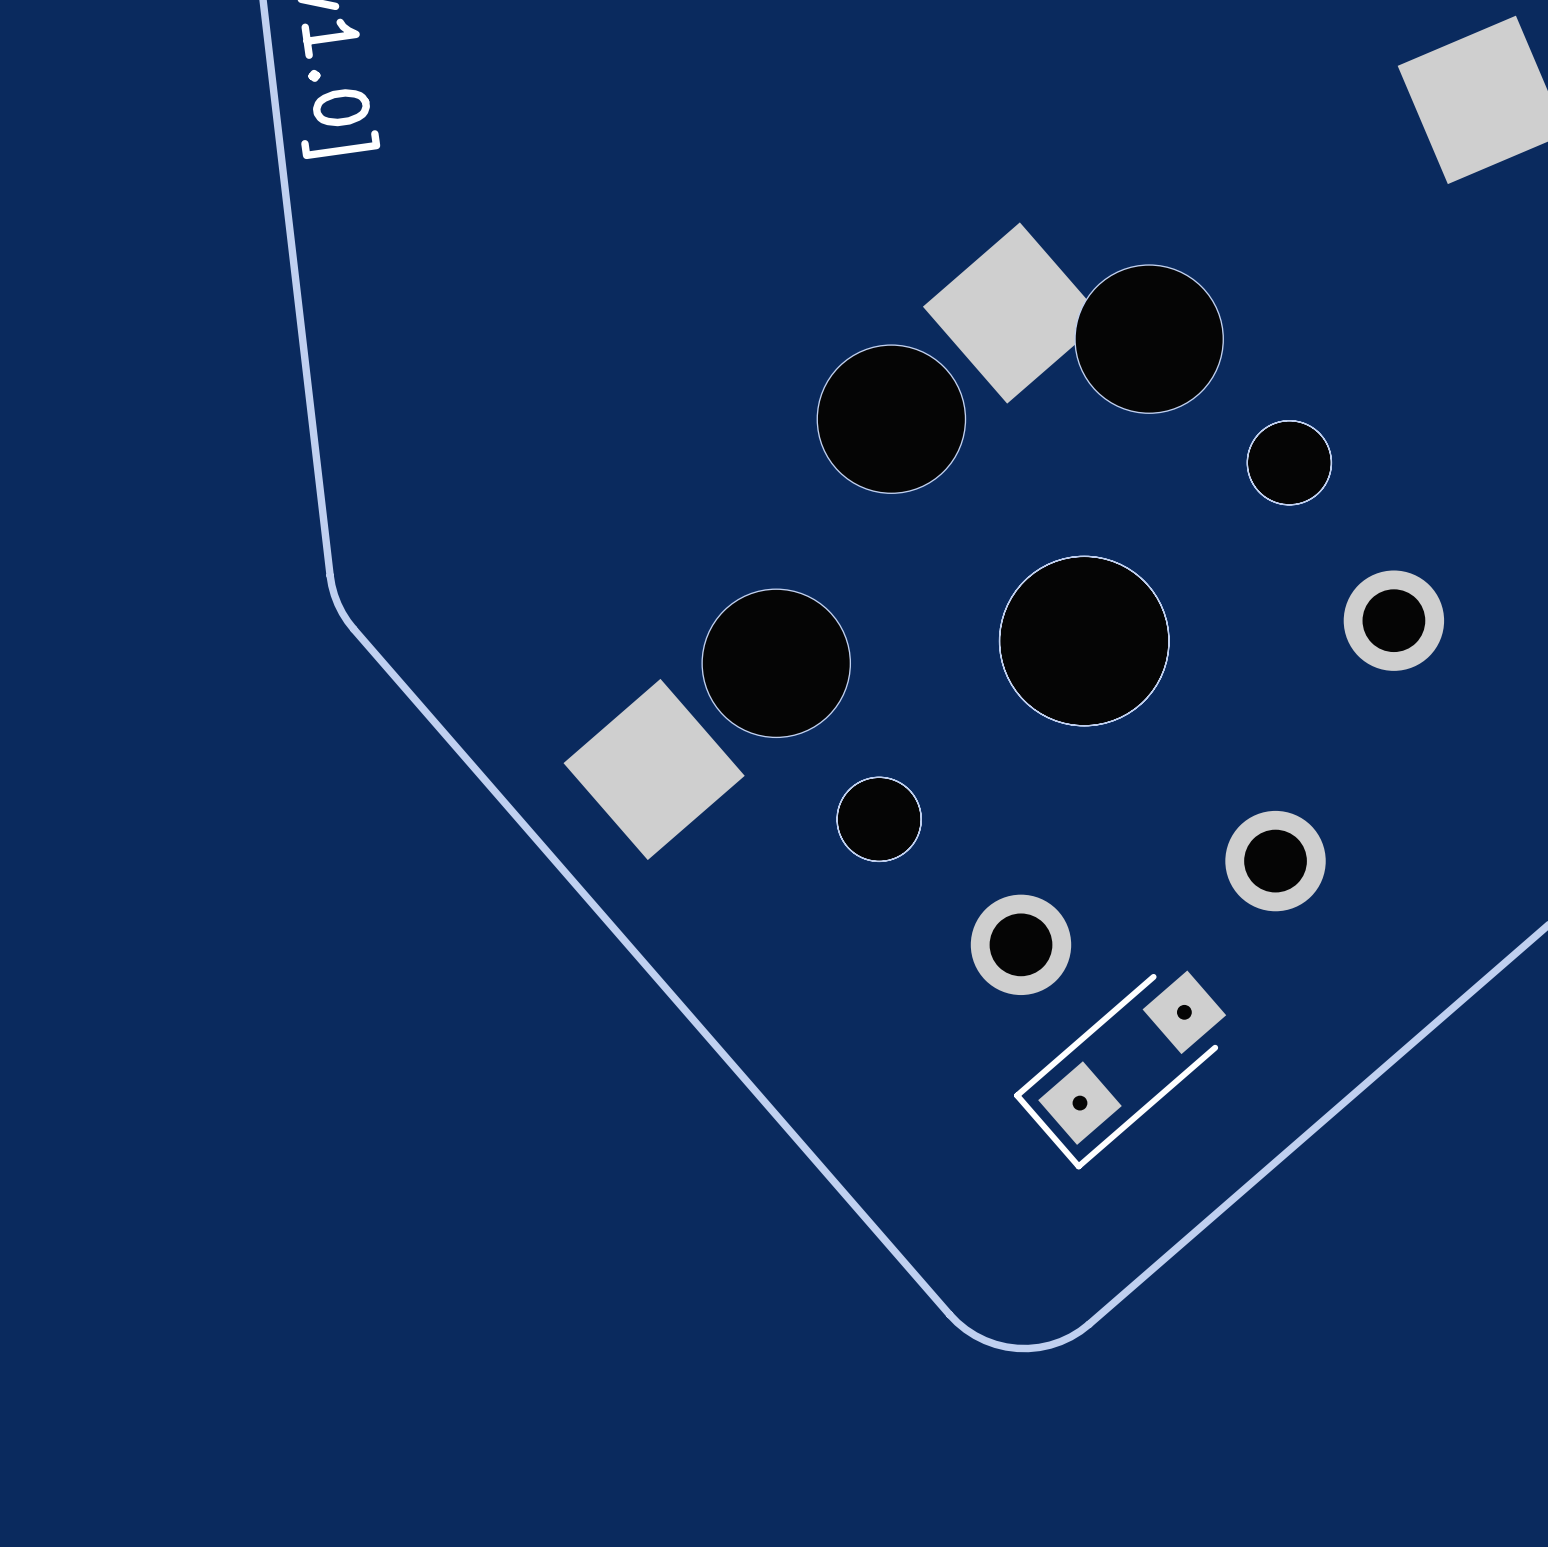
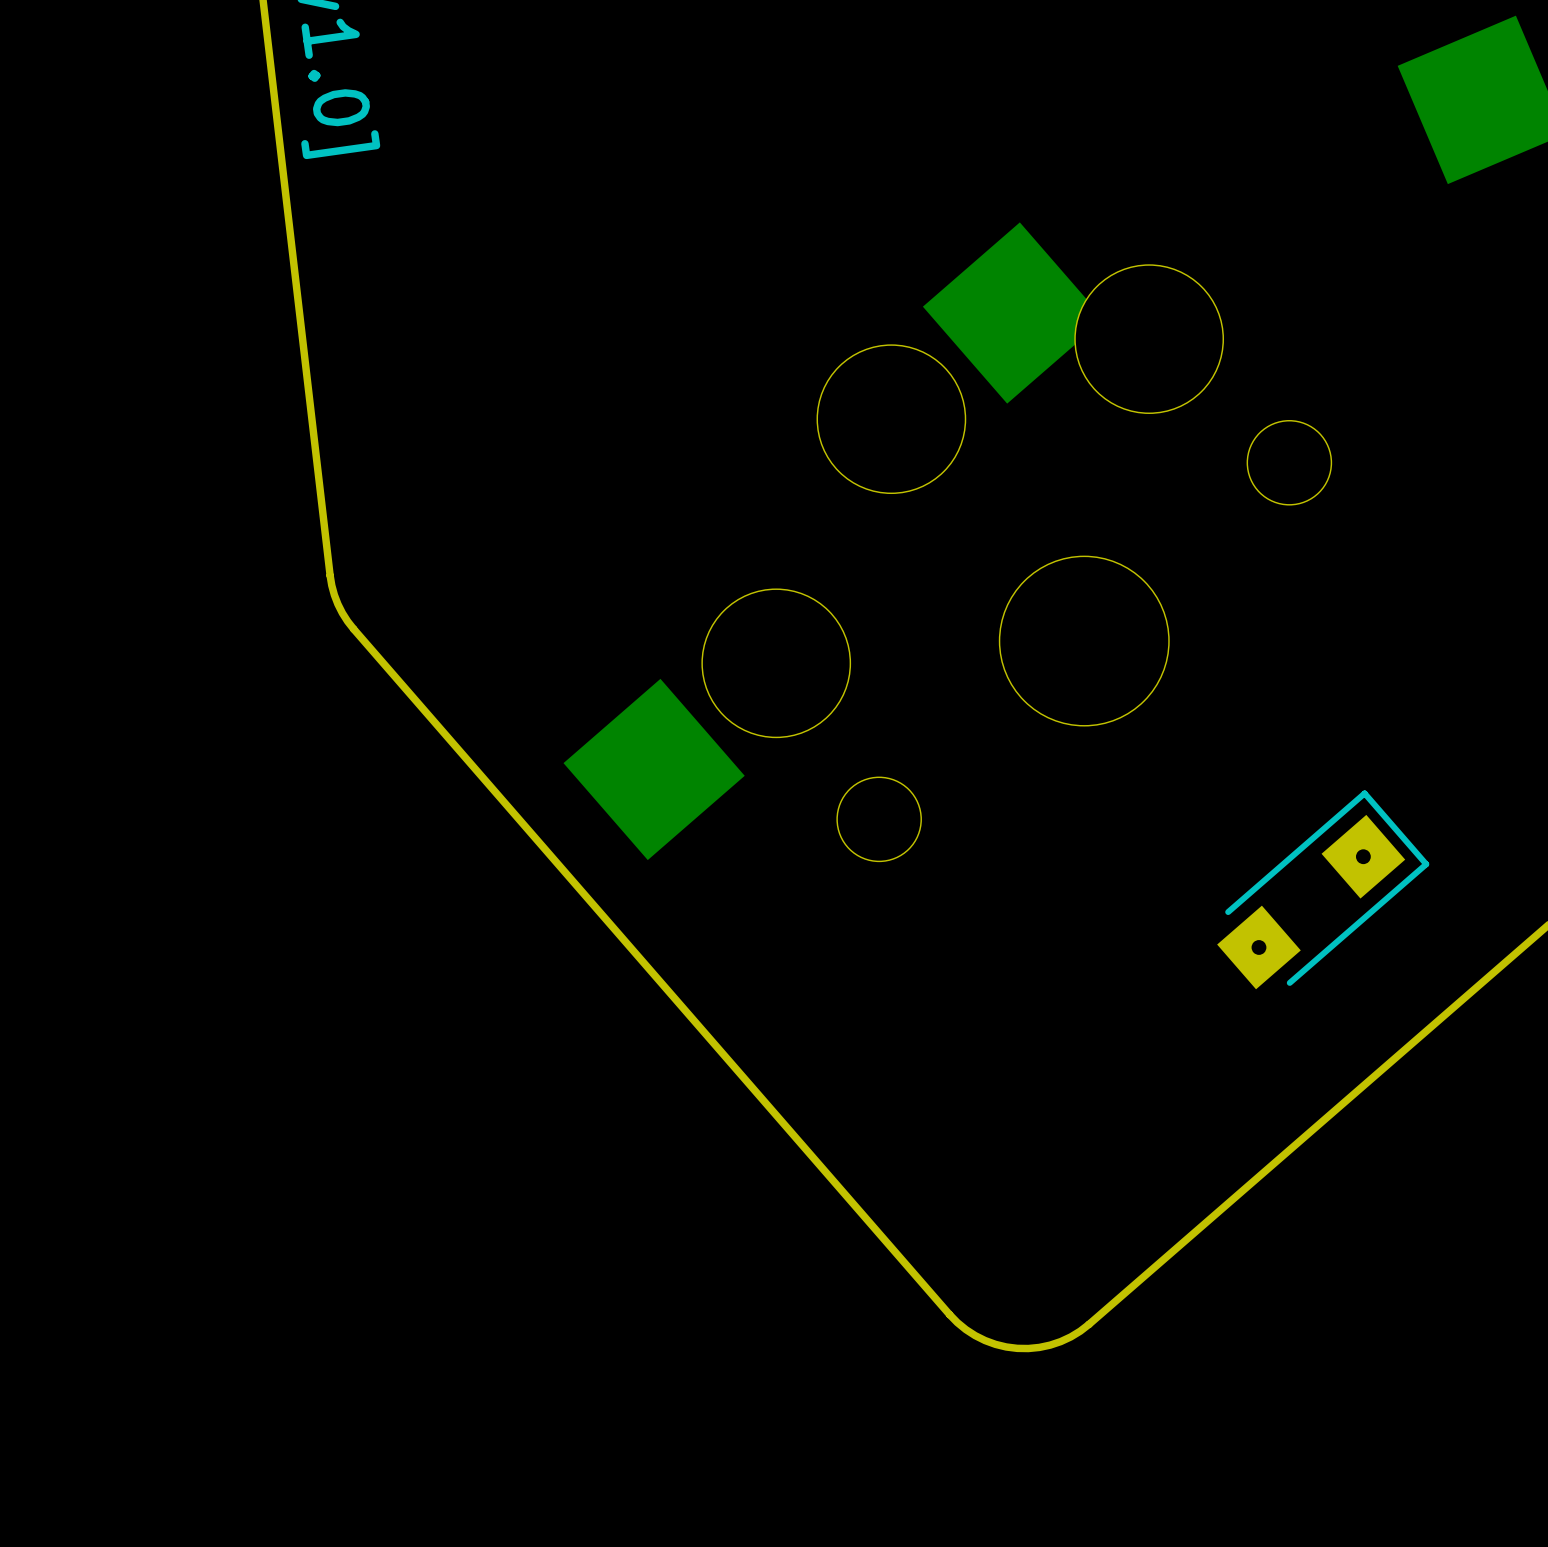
part: (1140, 707) -> none
part rotation: 0° (1120, 1069) -> 180° (1323, 889)
part position: (1120, 1069) -> (1323, 889)

